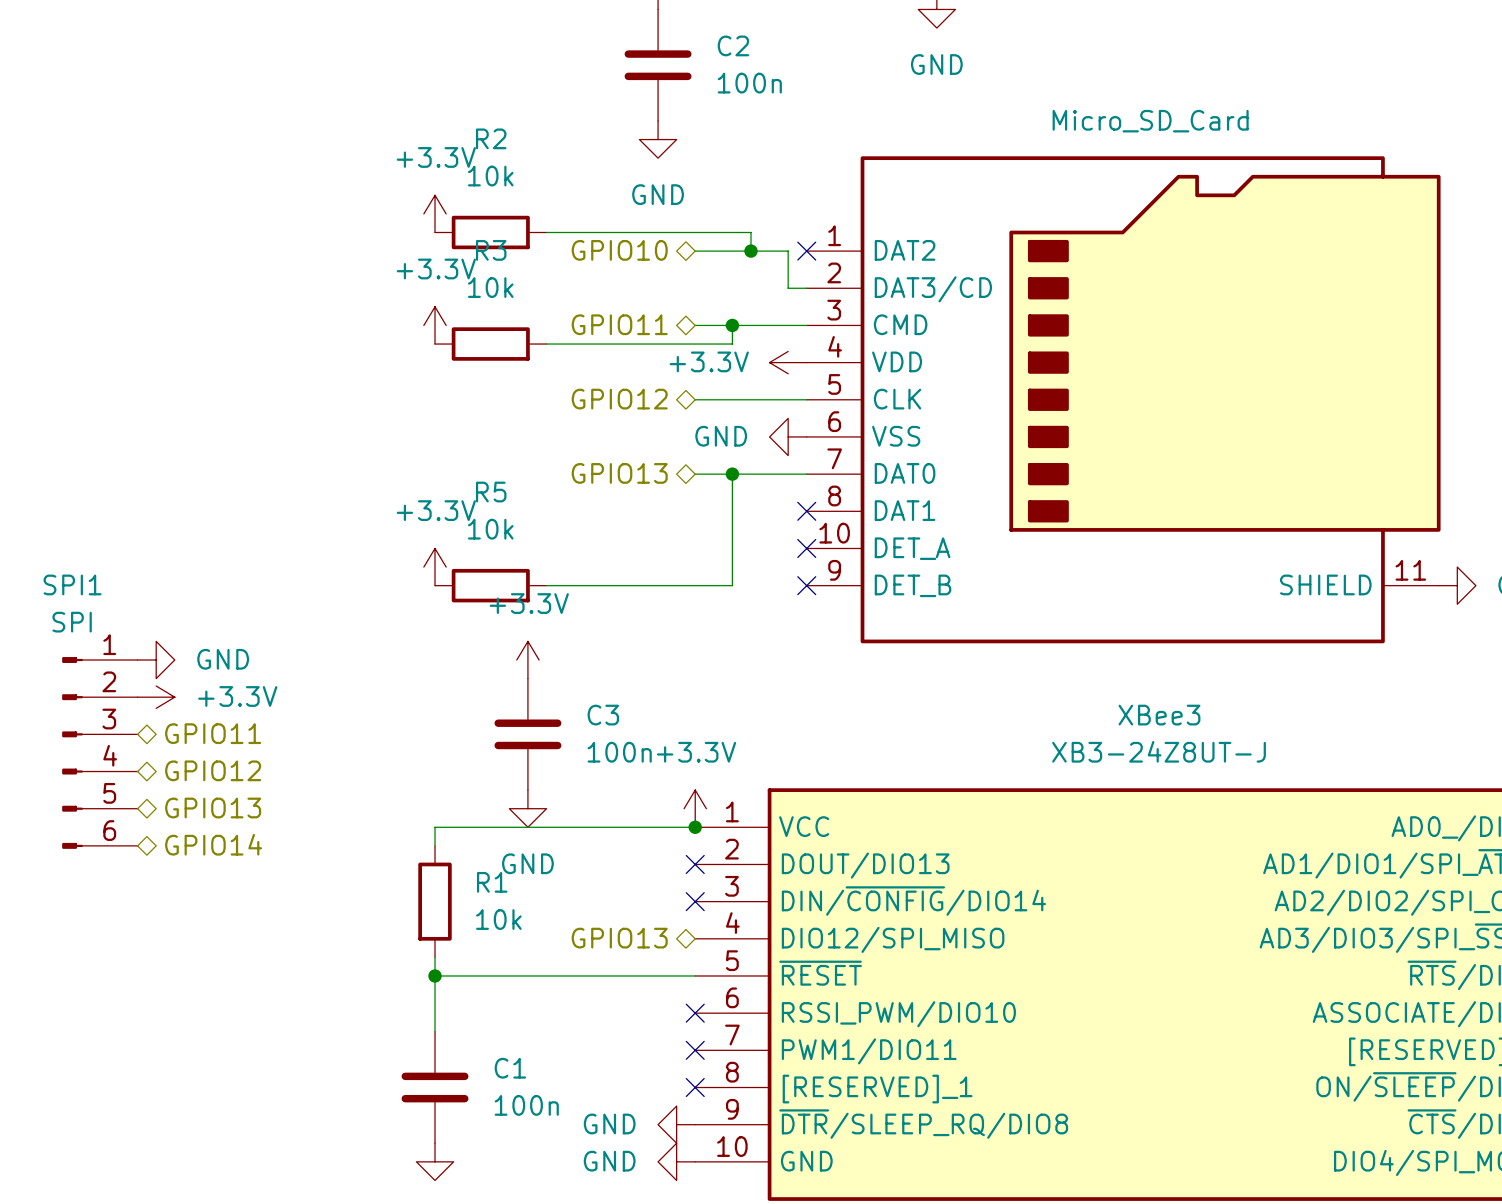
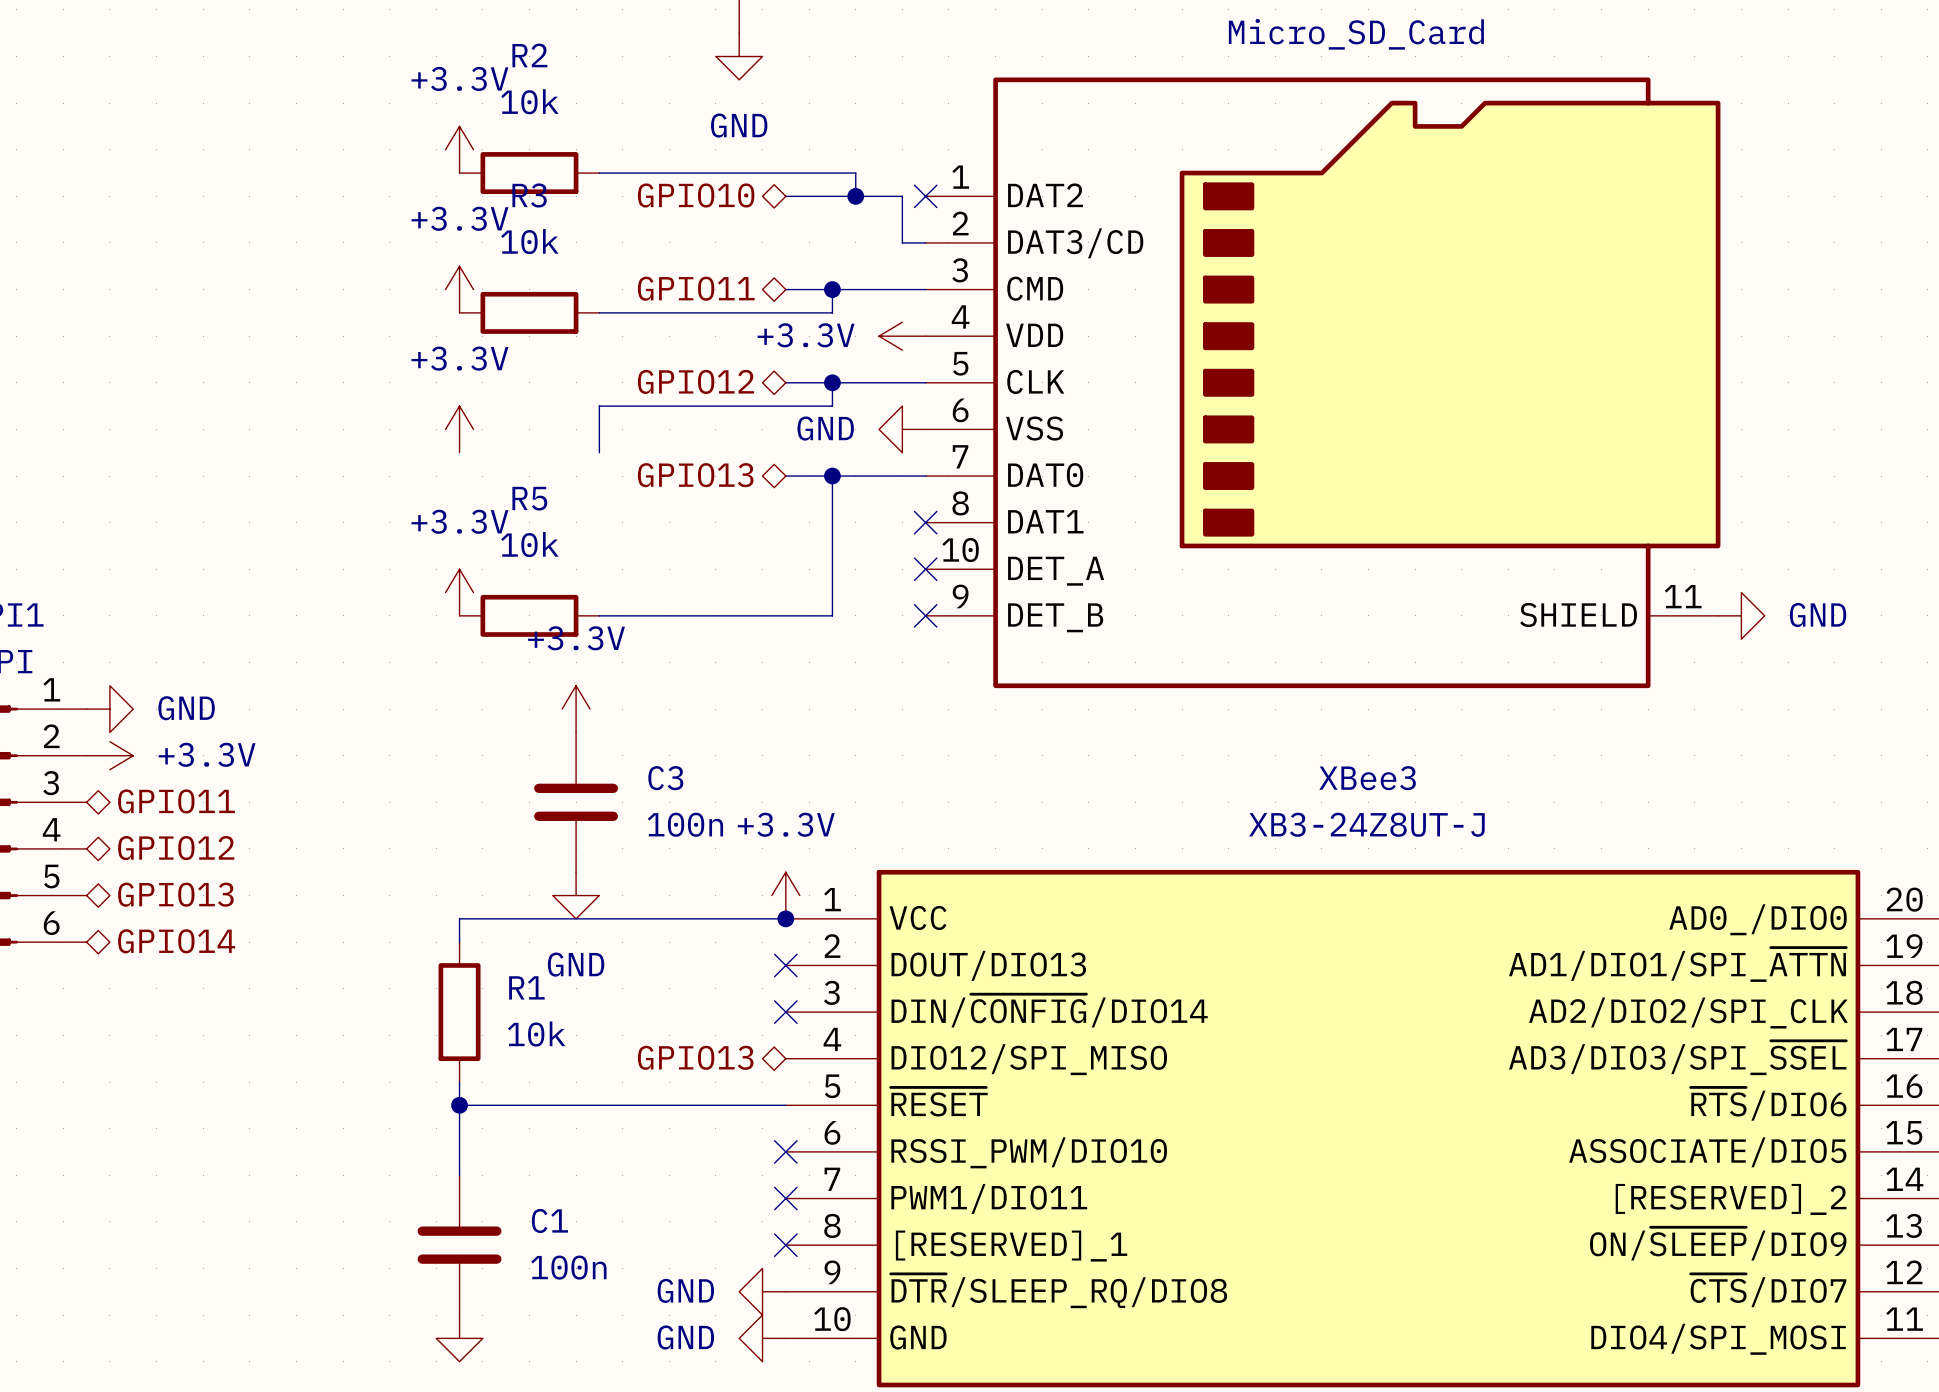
wire: none -> (832, 382) (832, 406) (599, 406) (599, 452)
junction: none -> (832, 382)
power symbol: none -> +3.3V (459, 429)

